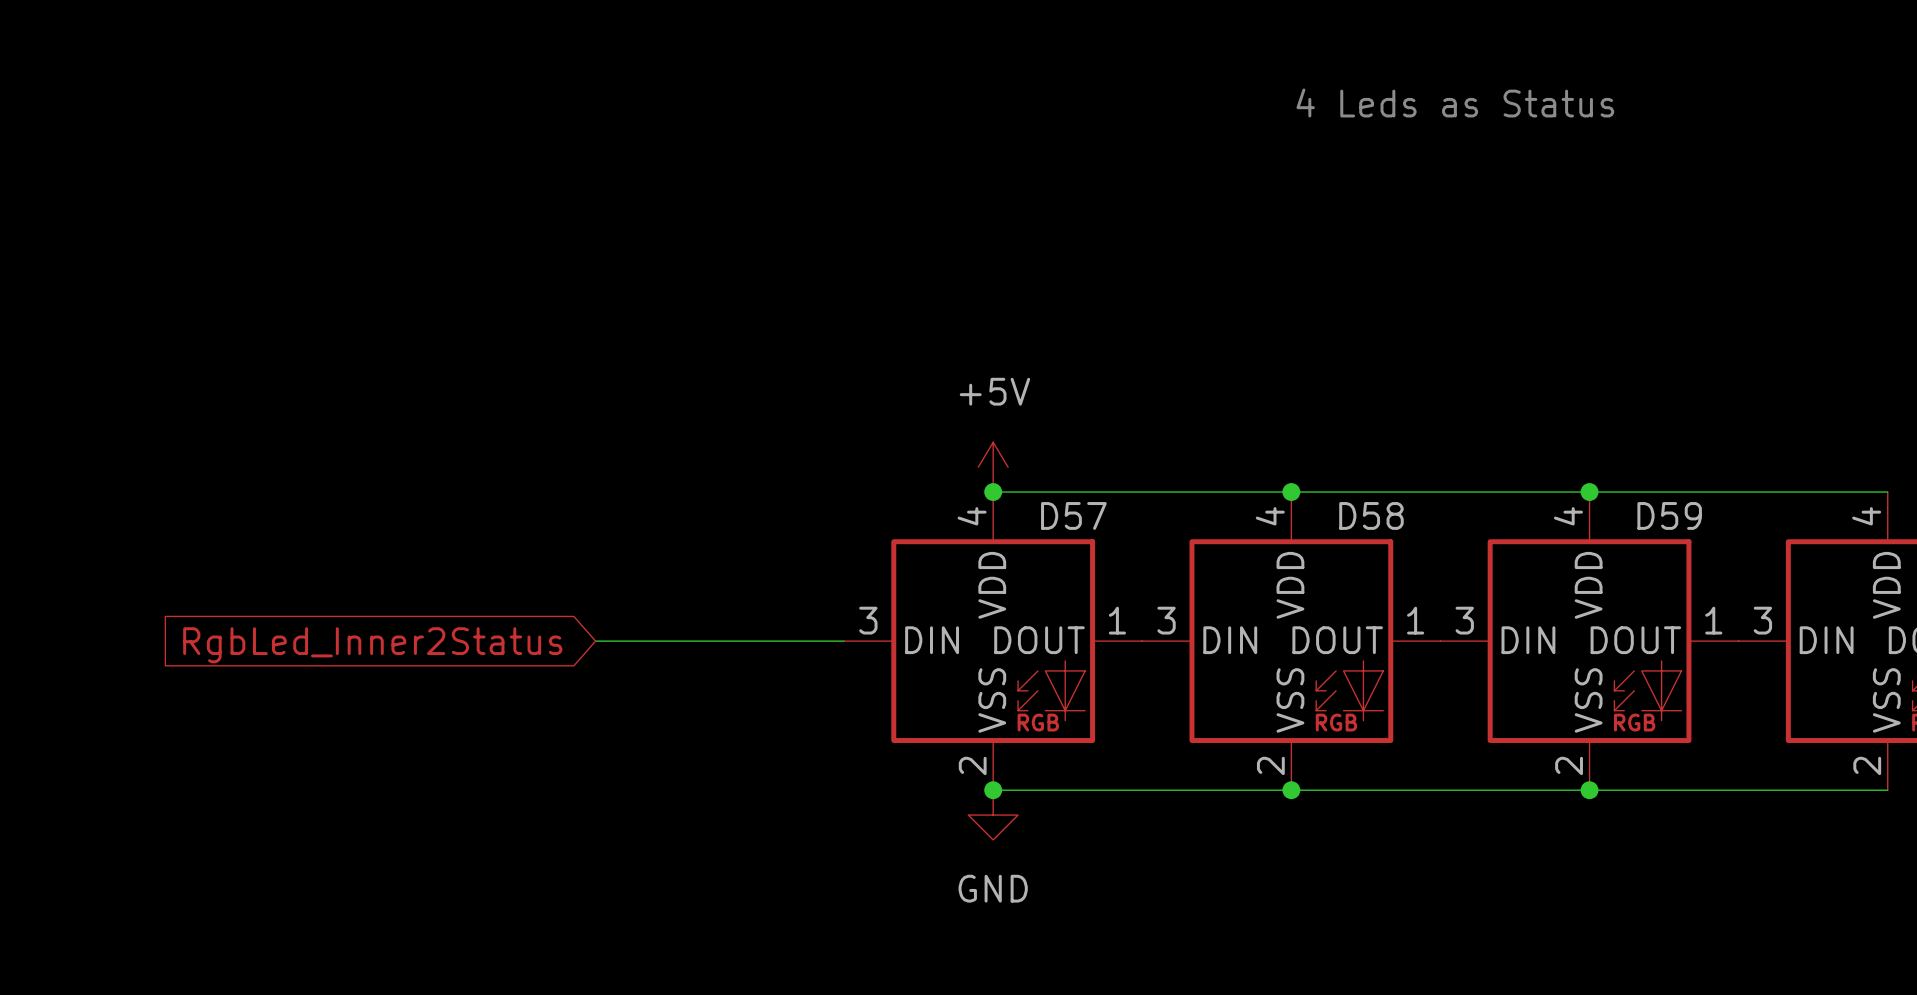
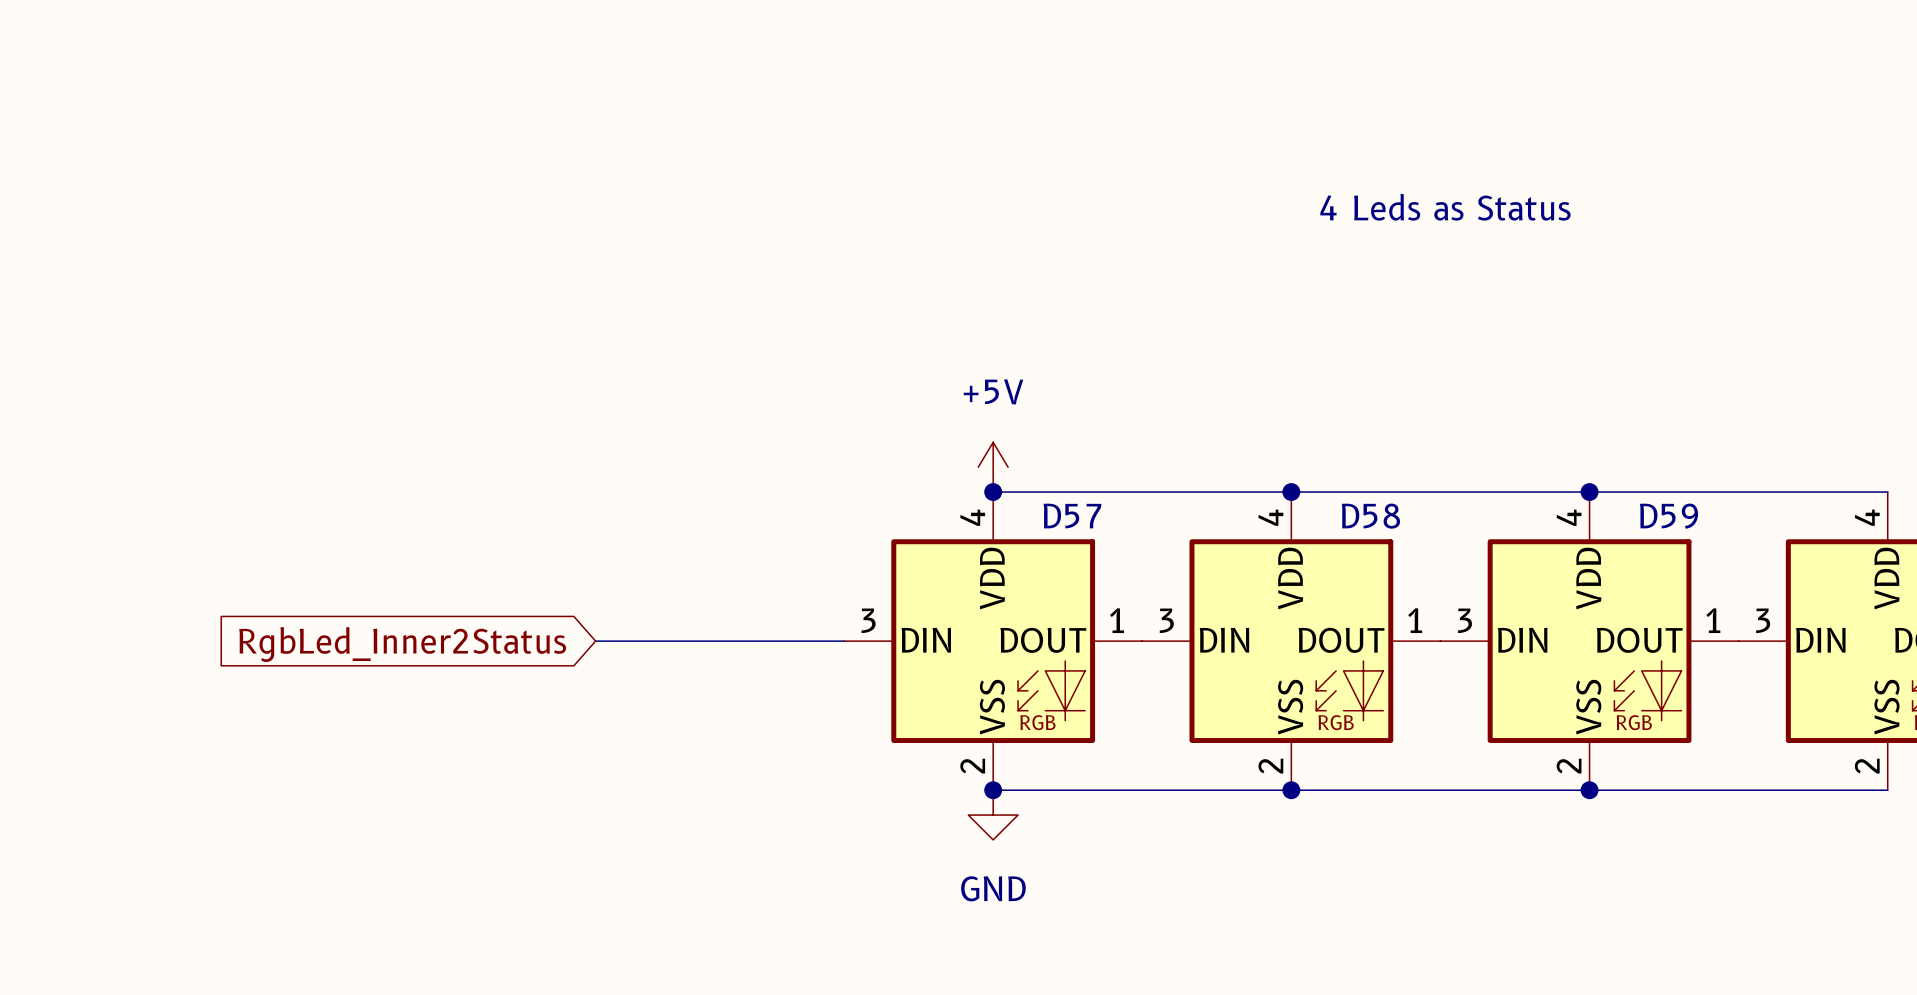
text position: 4 Leds as Status (1455, 102) -> 4 Leds as Status (1445, 207)

